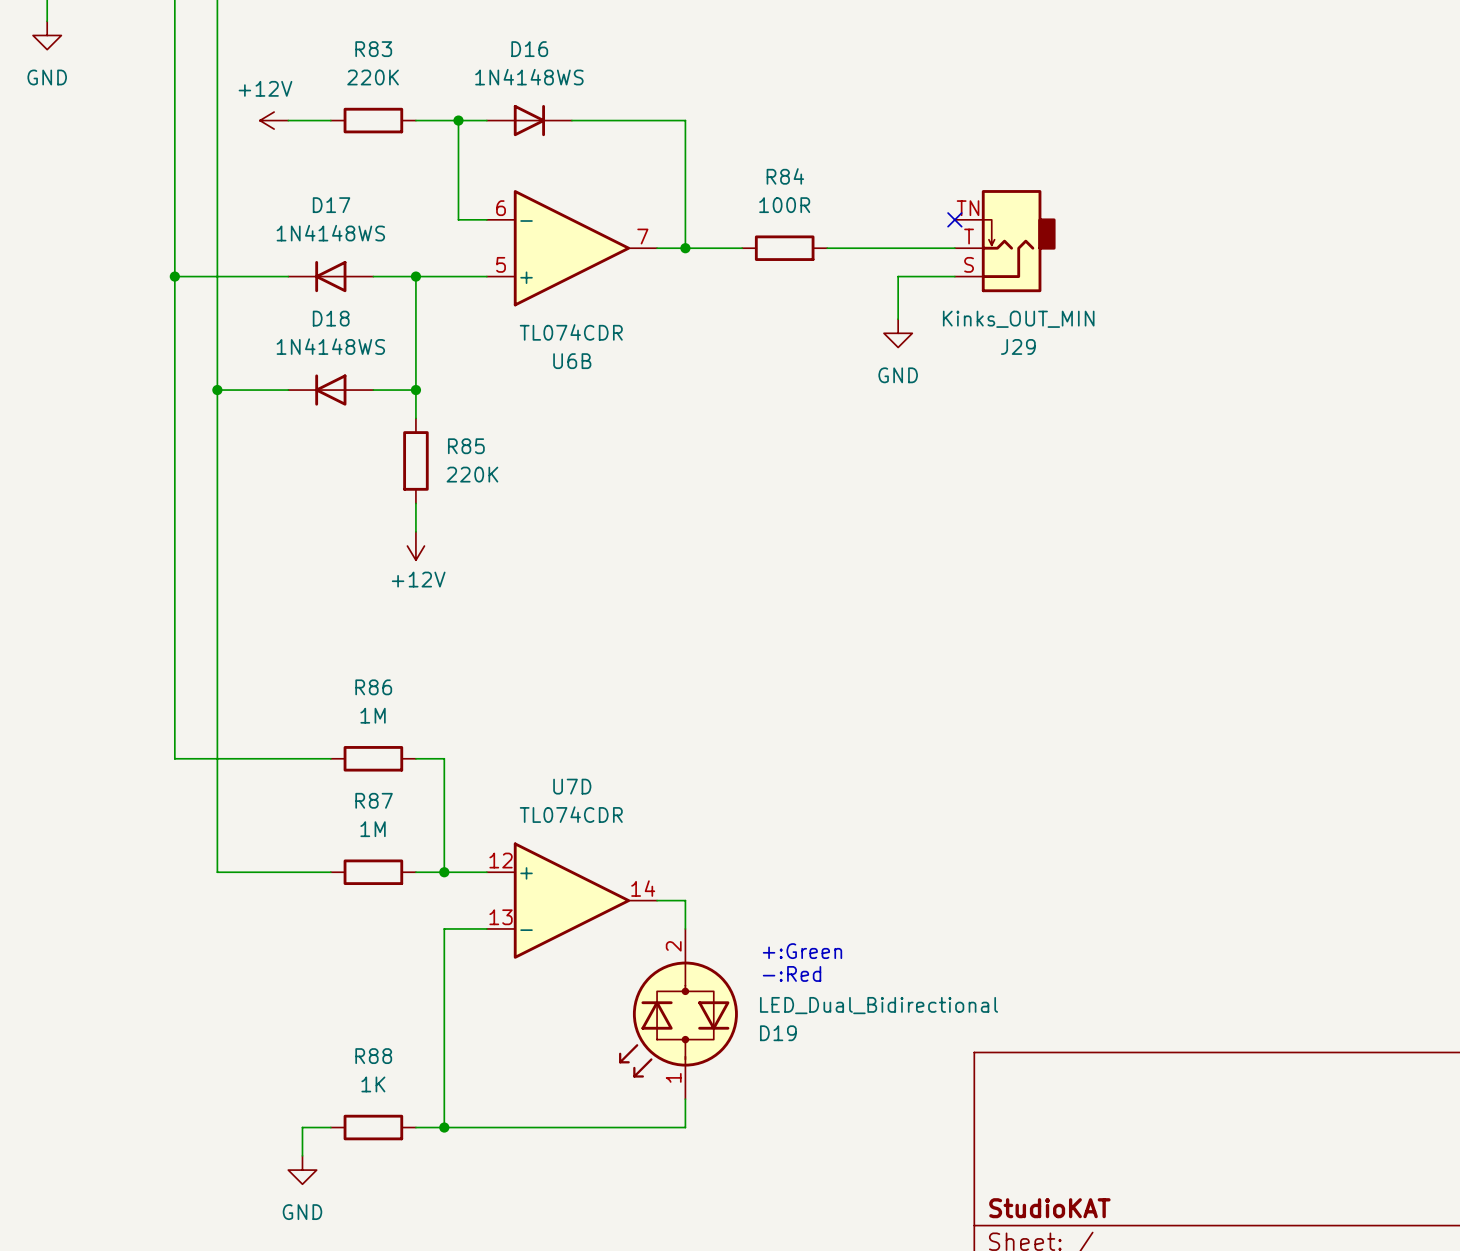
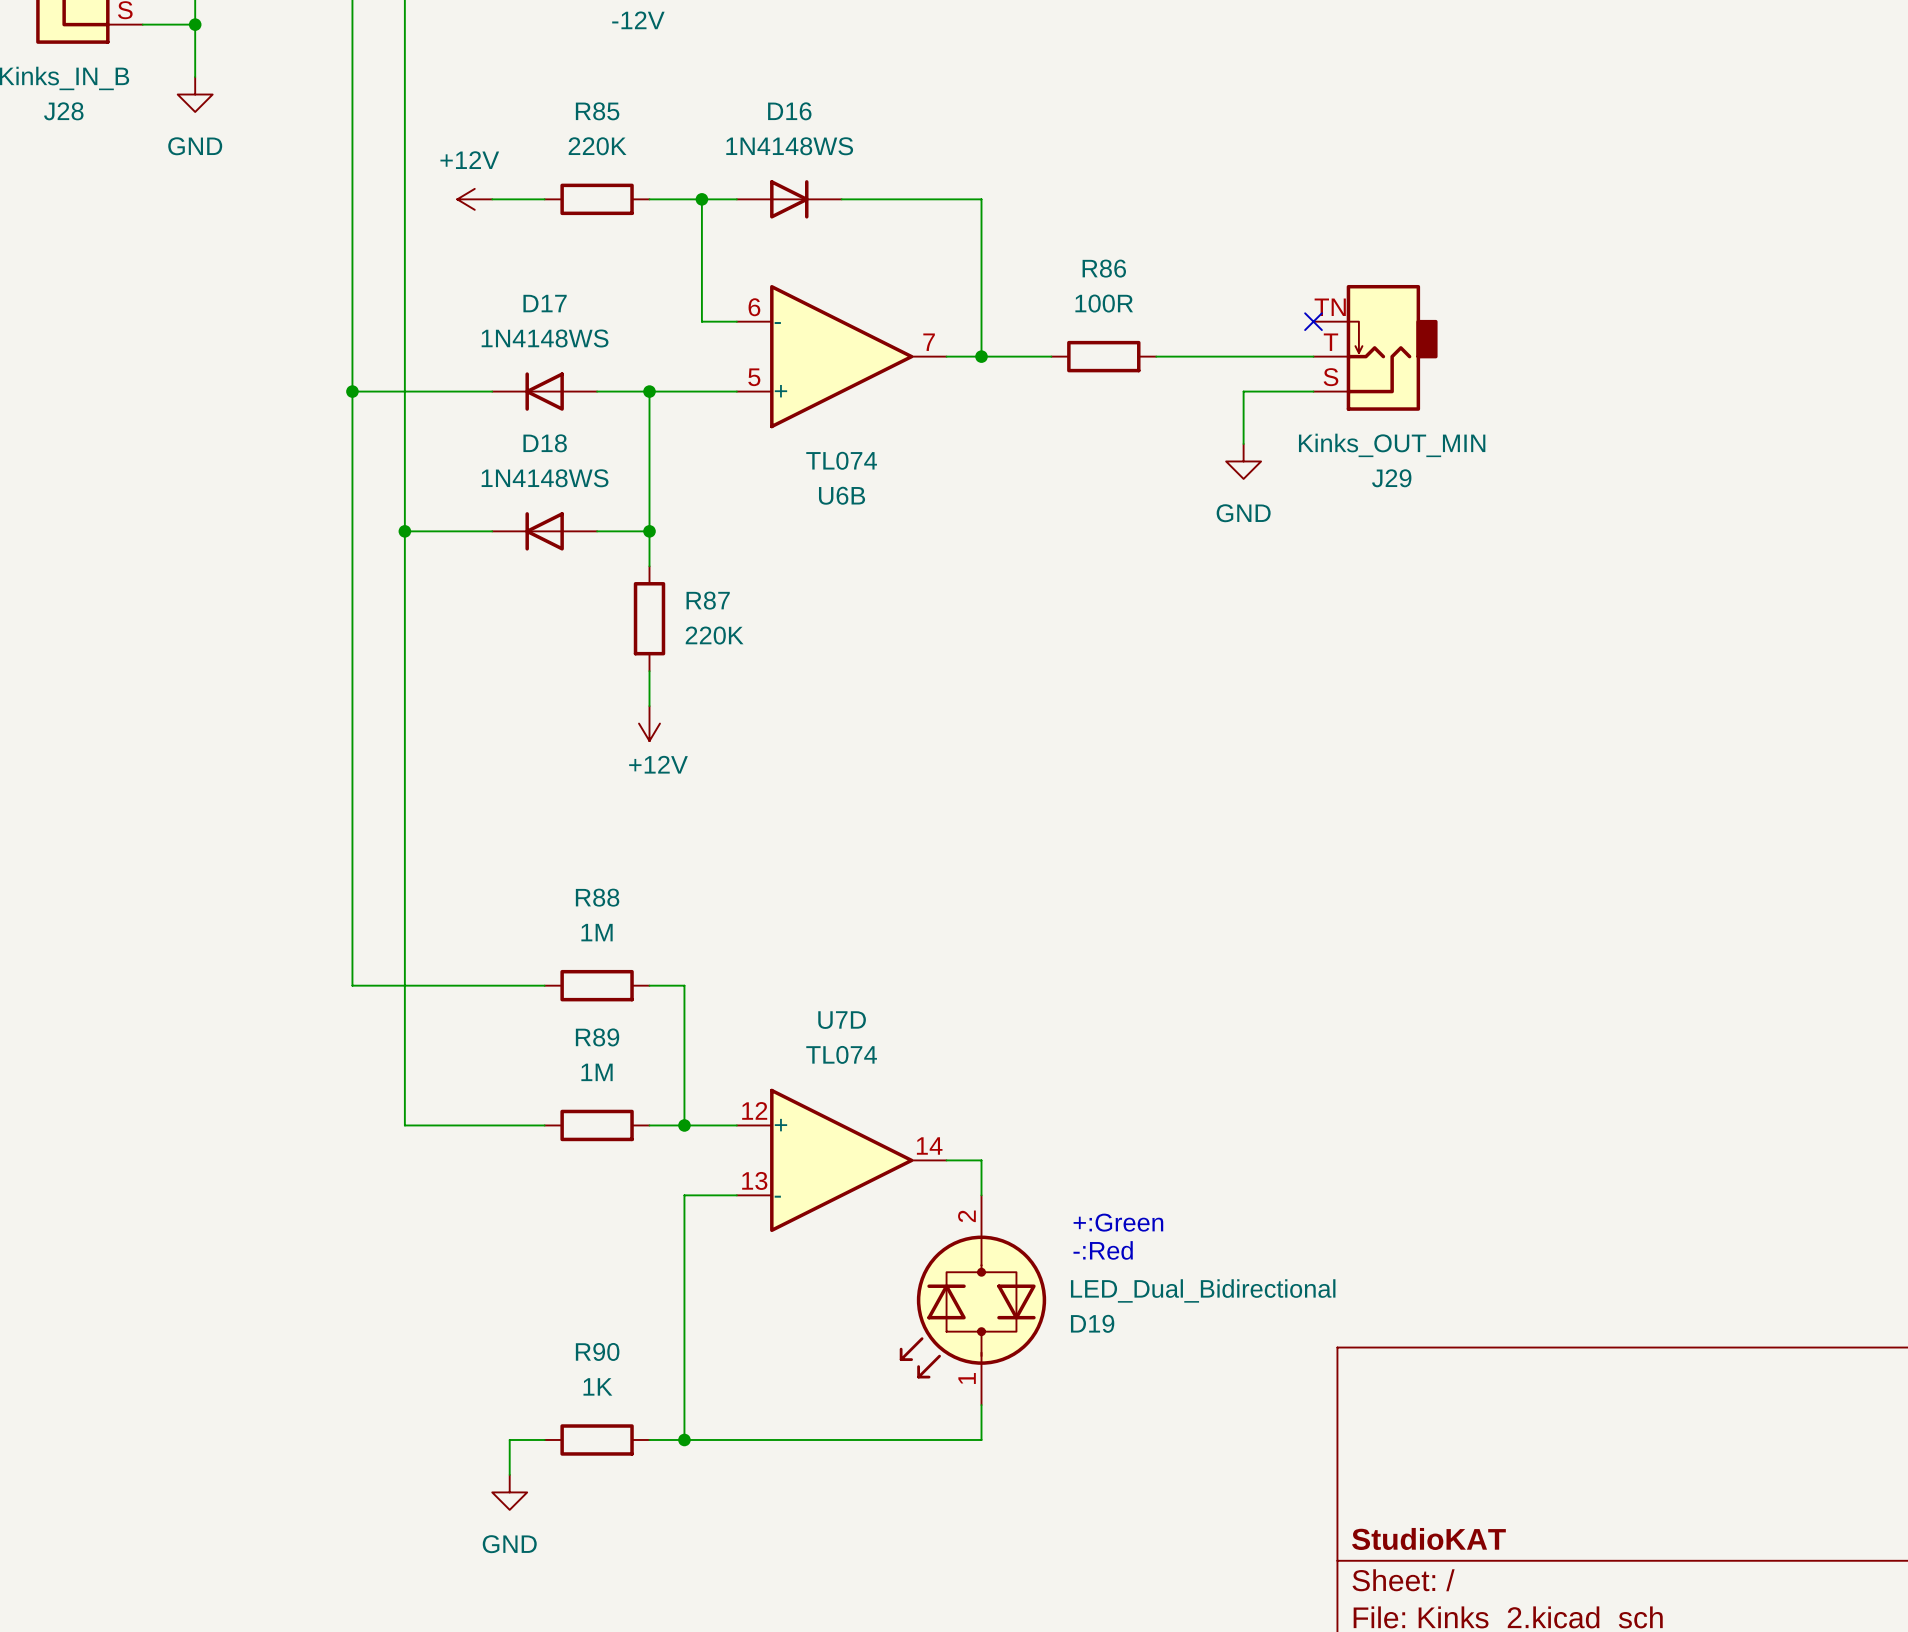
R83 name: R83 (373, 49) -> R85 (597, 111)
R84 name: R84 (785, 176) -> R86 (1104, 268)
U6B value: TL074CDR (571, 332) -> TL074 (841, 460)
R85 name: R85 (466, 446) -> R87 (708, 600)
R86 name: R86 (373, 687) -> R88 (597, 897)
R87 name: R87 (374, 800) -> R89 (597, 1037)
U7D value: TL074CDR (571, 814) -> TL074 (841, 1054)
R88 name: R88 (373, 1056) -> R90 (597, 1351)

